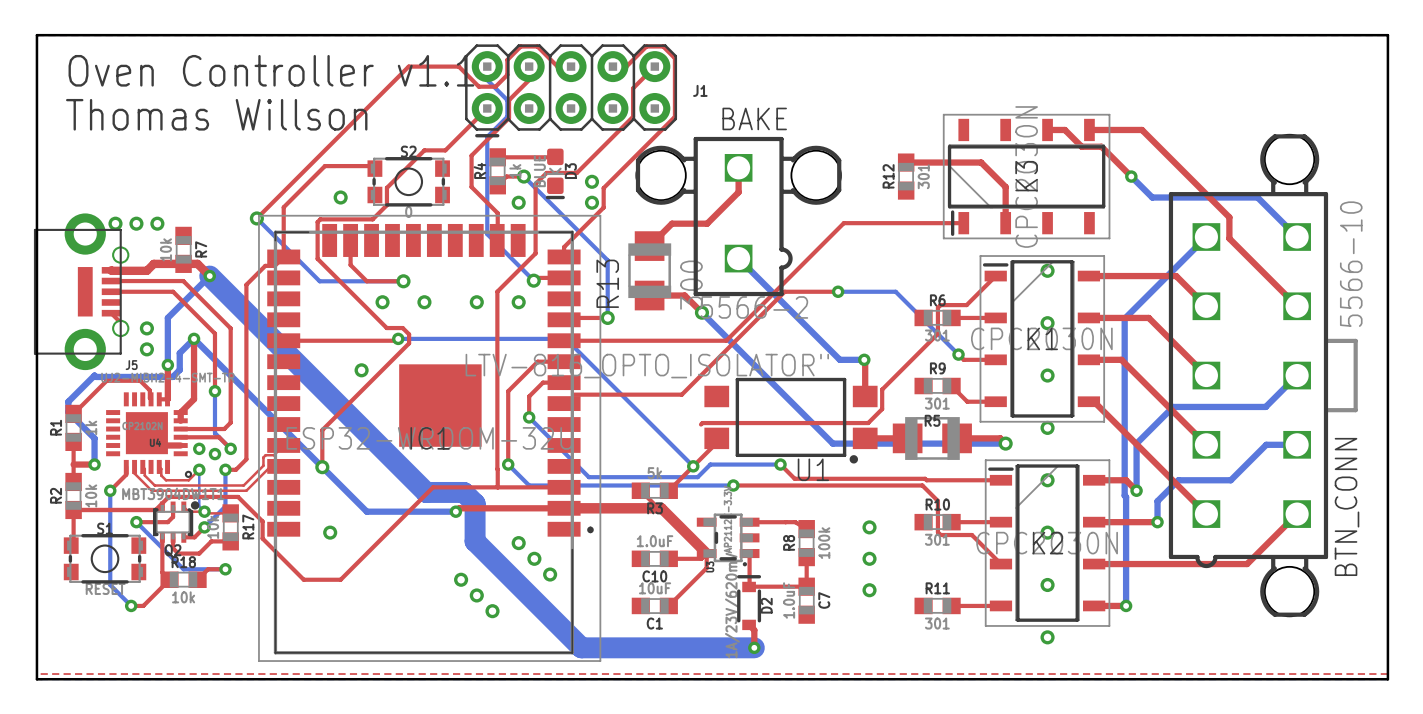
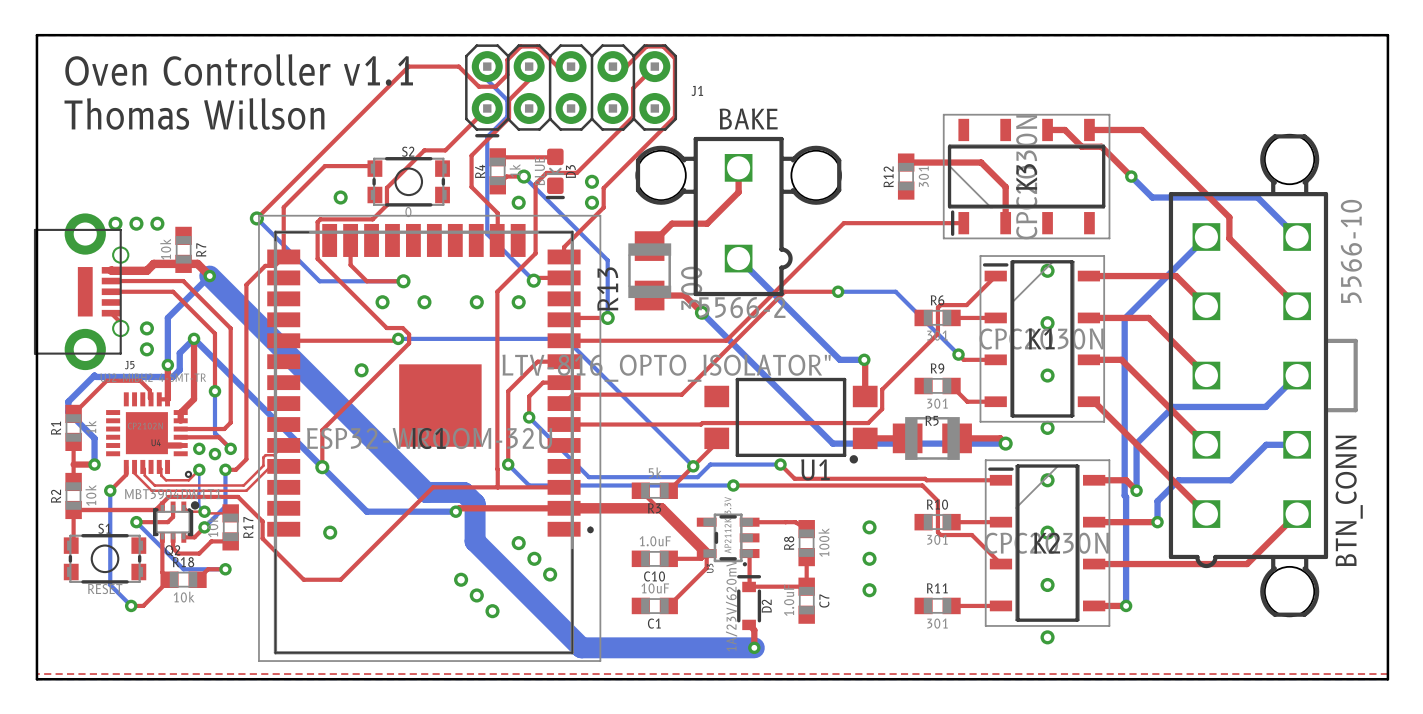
top track: none -> (564, 424) (701, 424)

